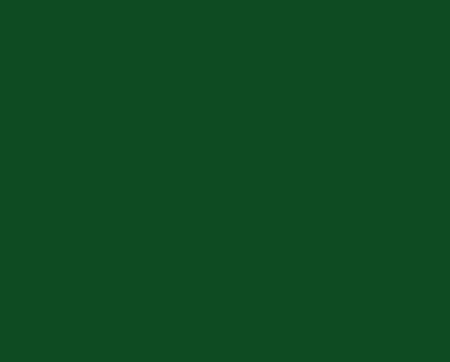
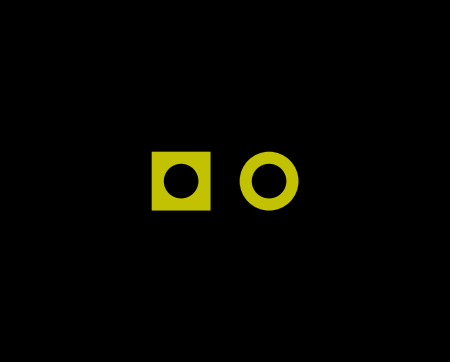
part: none -> (225, 181)

